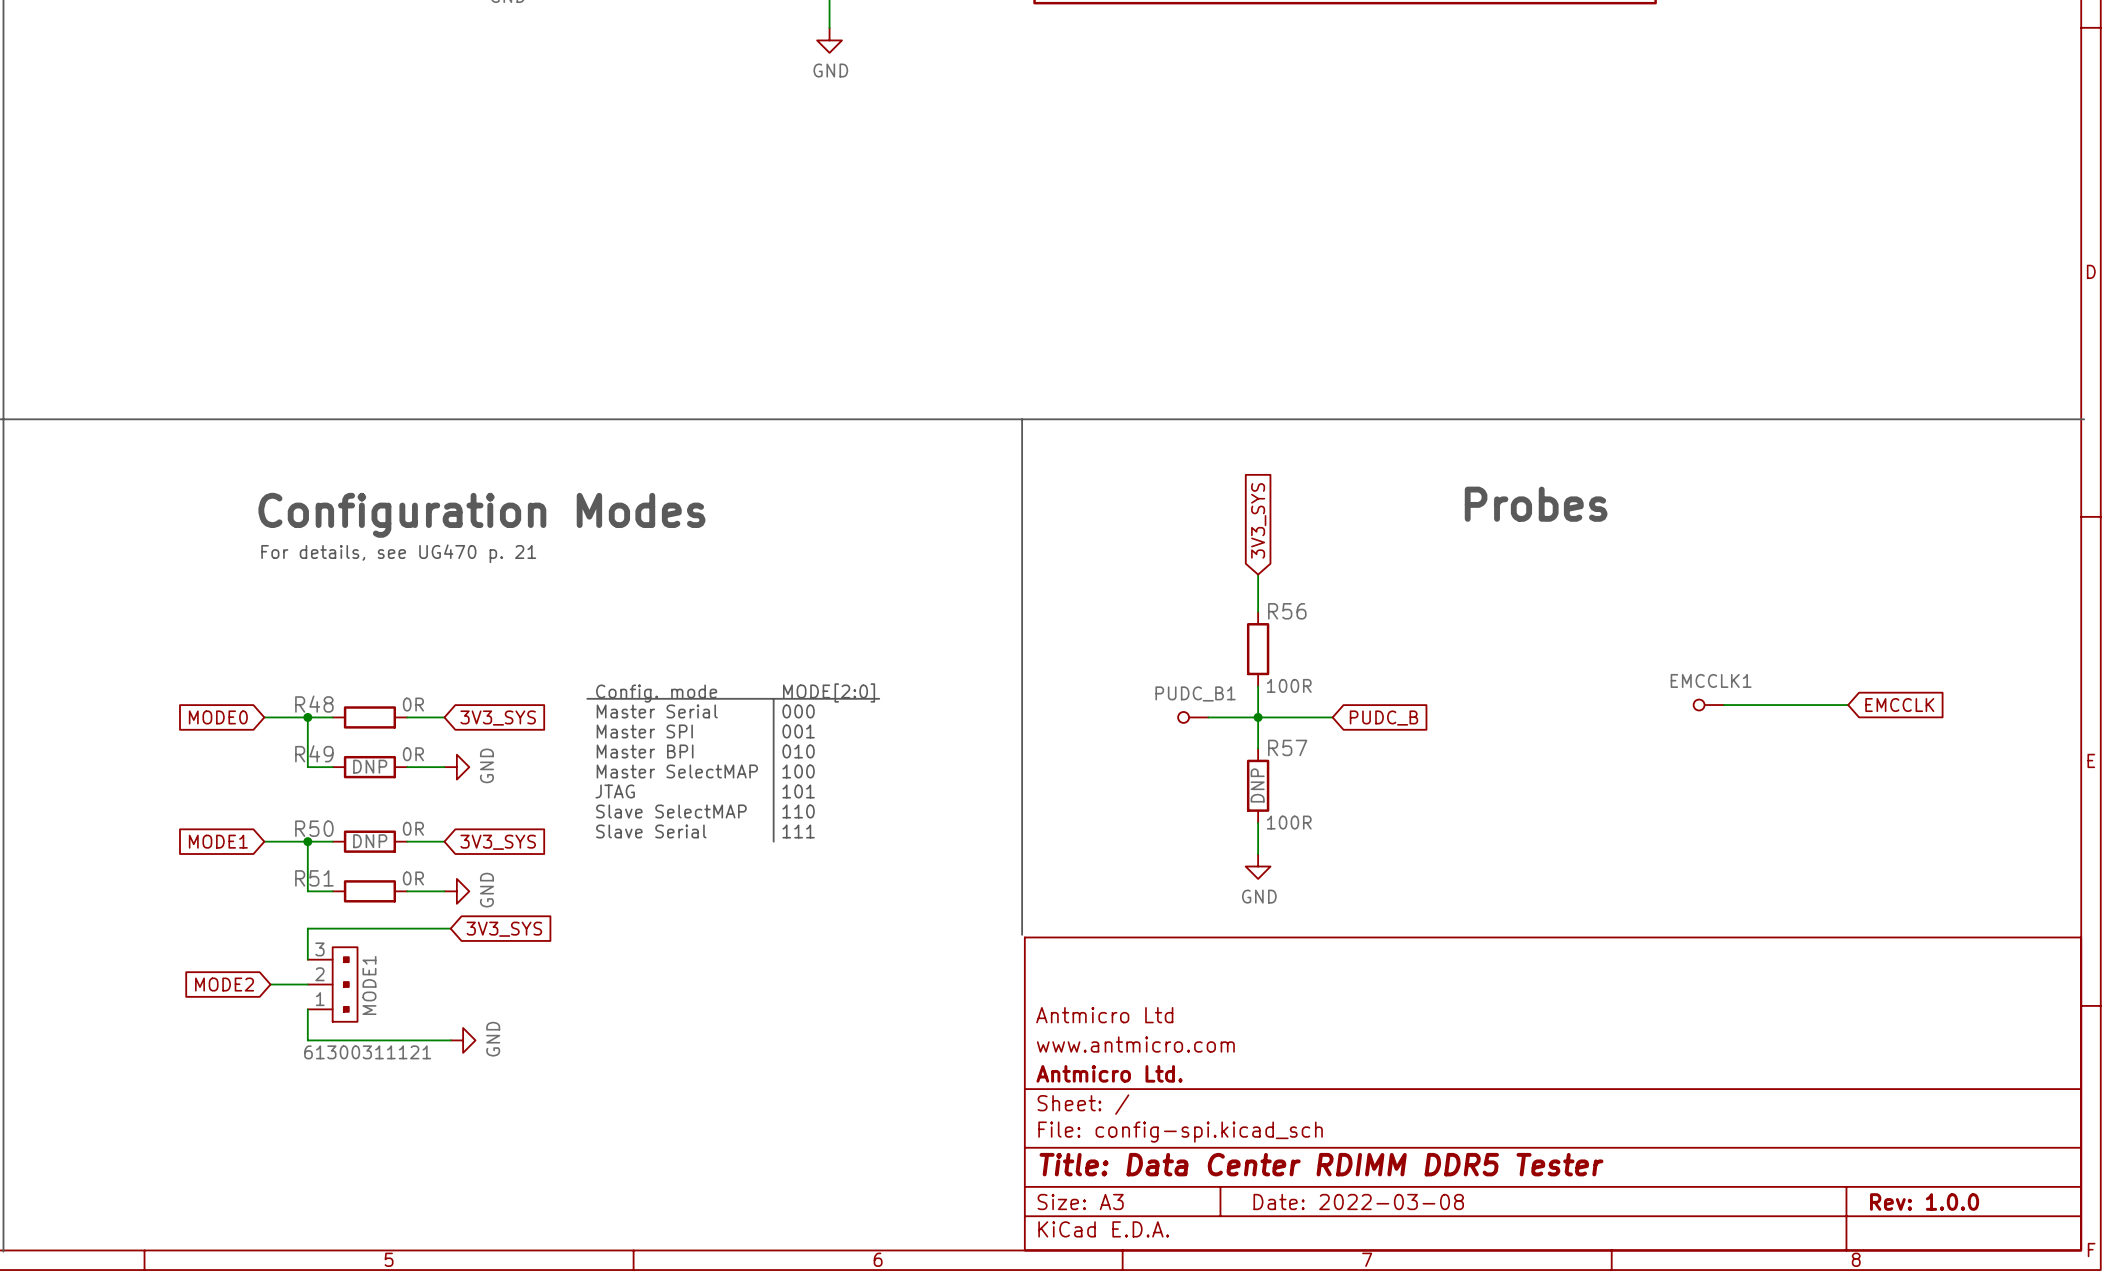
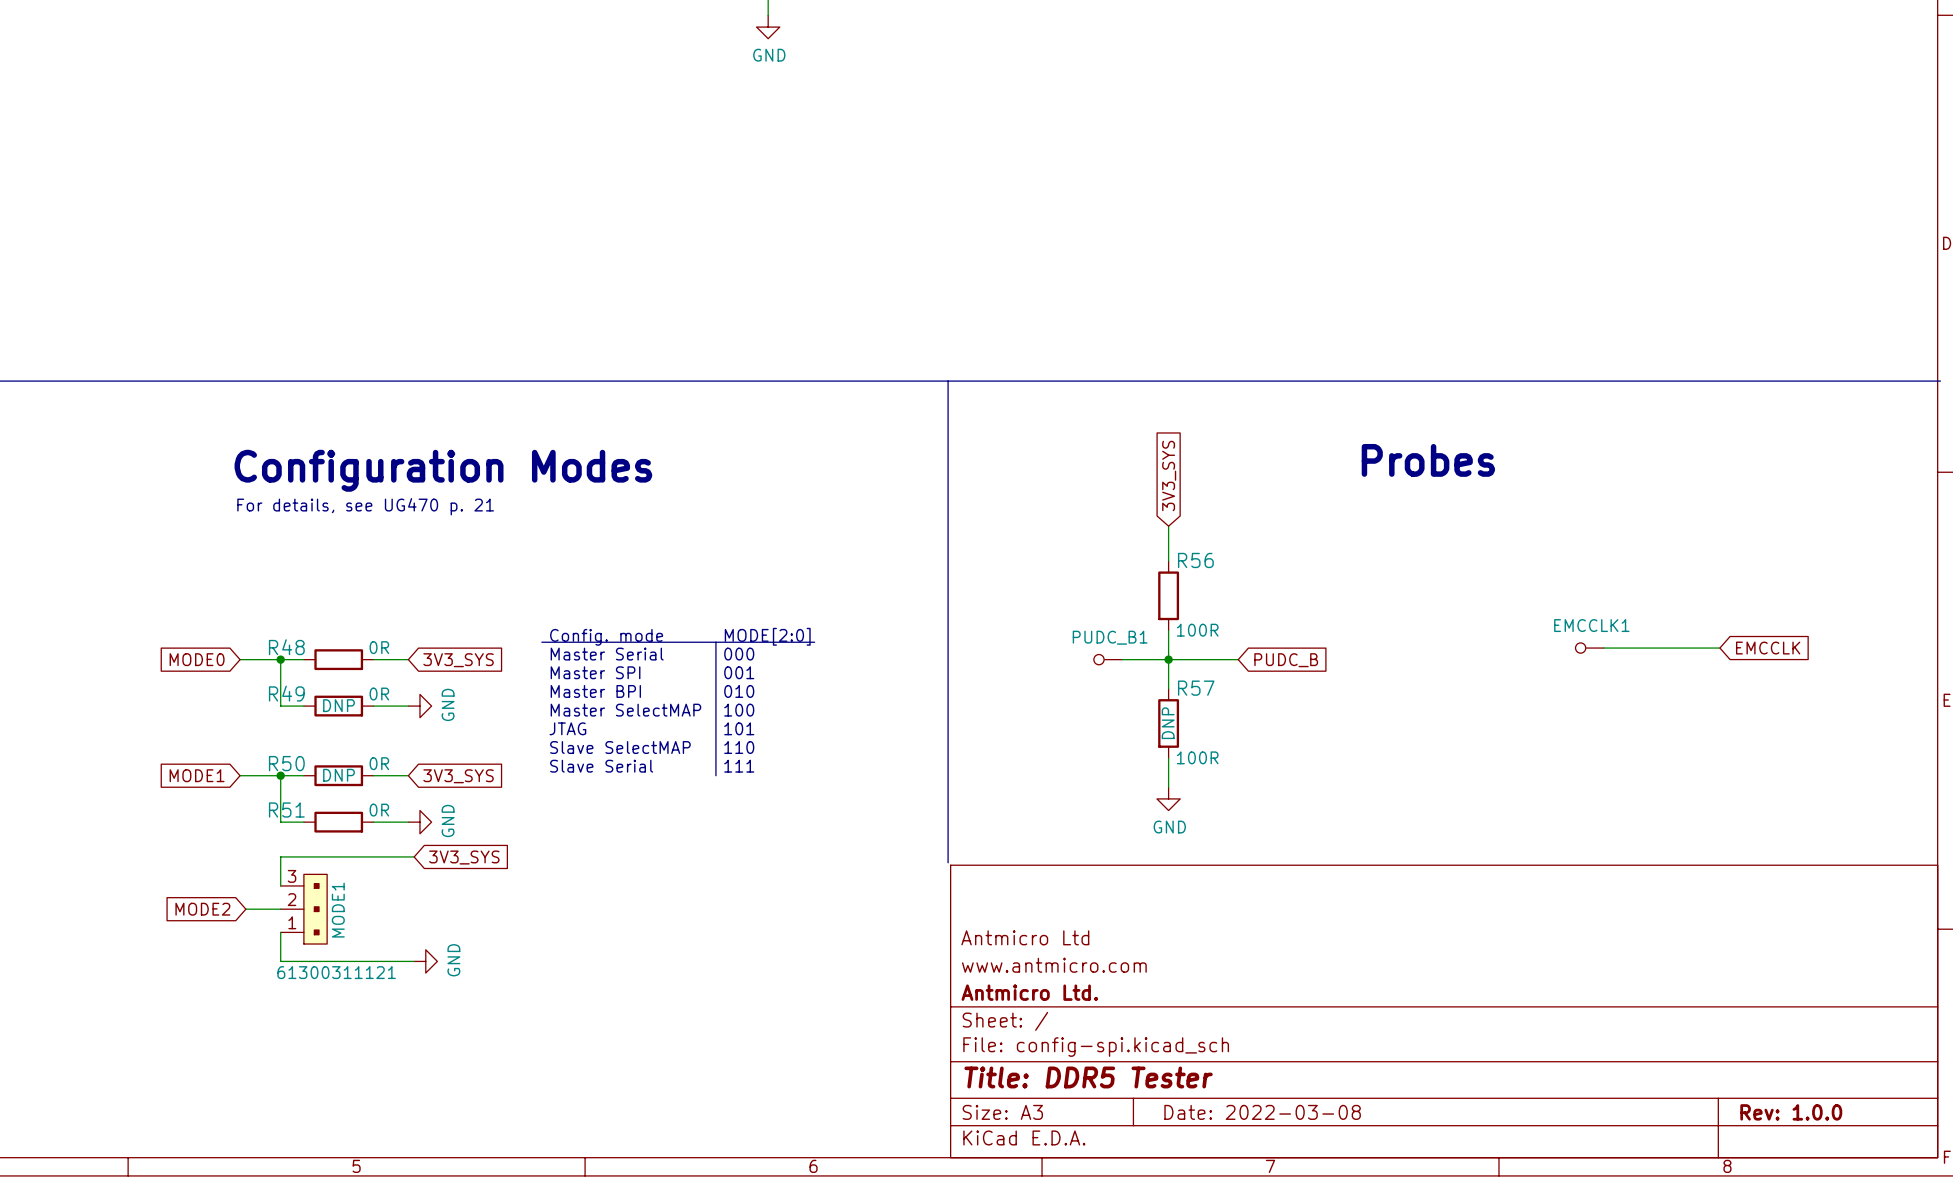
title block: Title: Data Center RDIMM DDR5 Tester (1321, 1164) -> Title: DDR5 Tester (1088, 1077)

